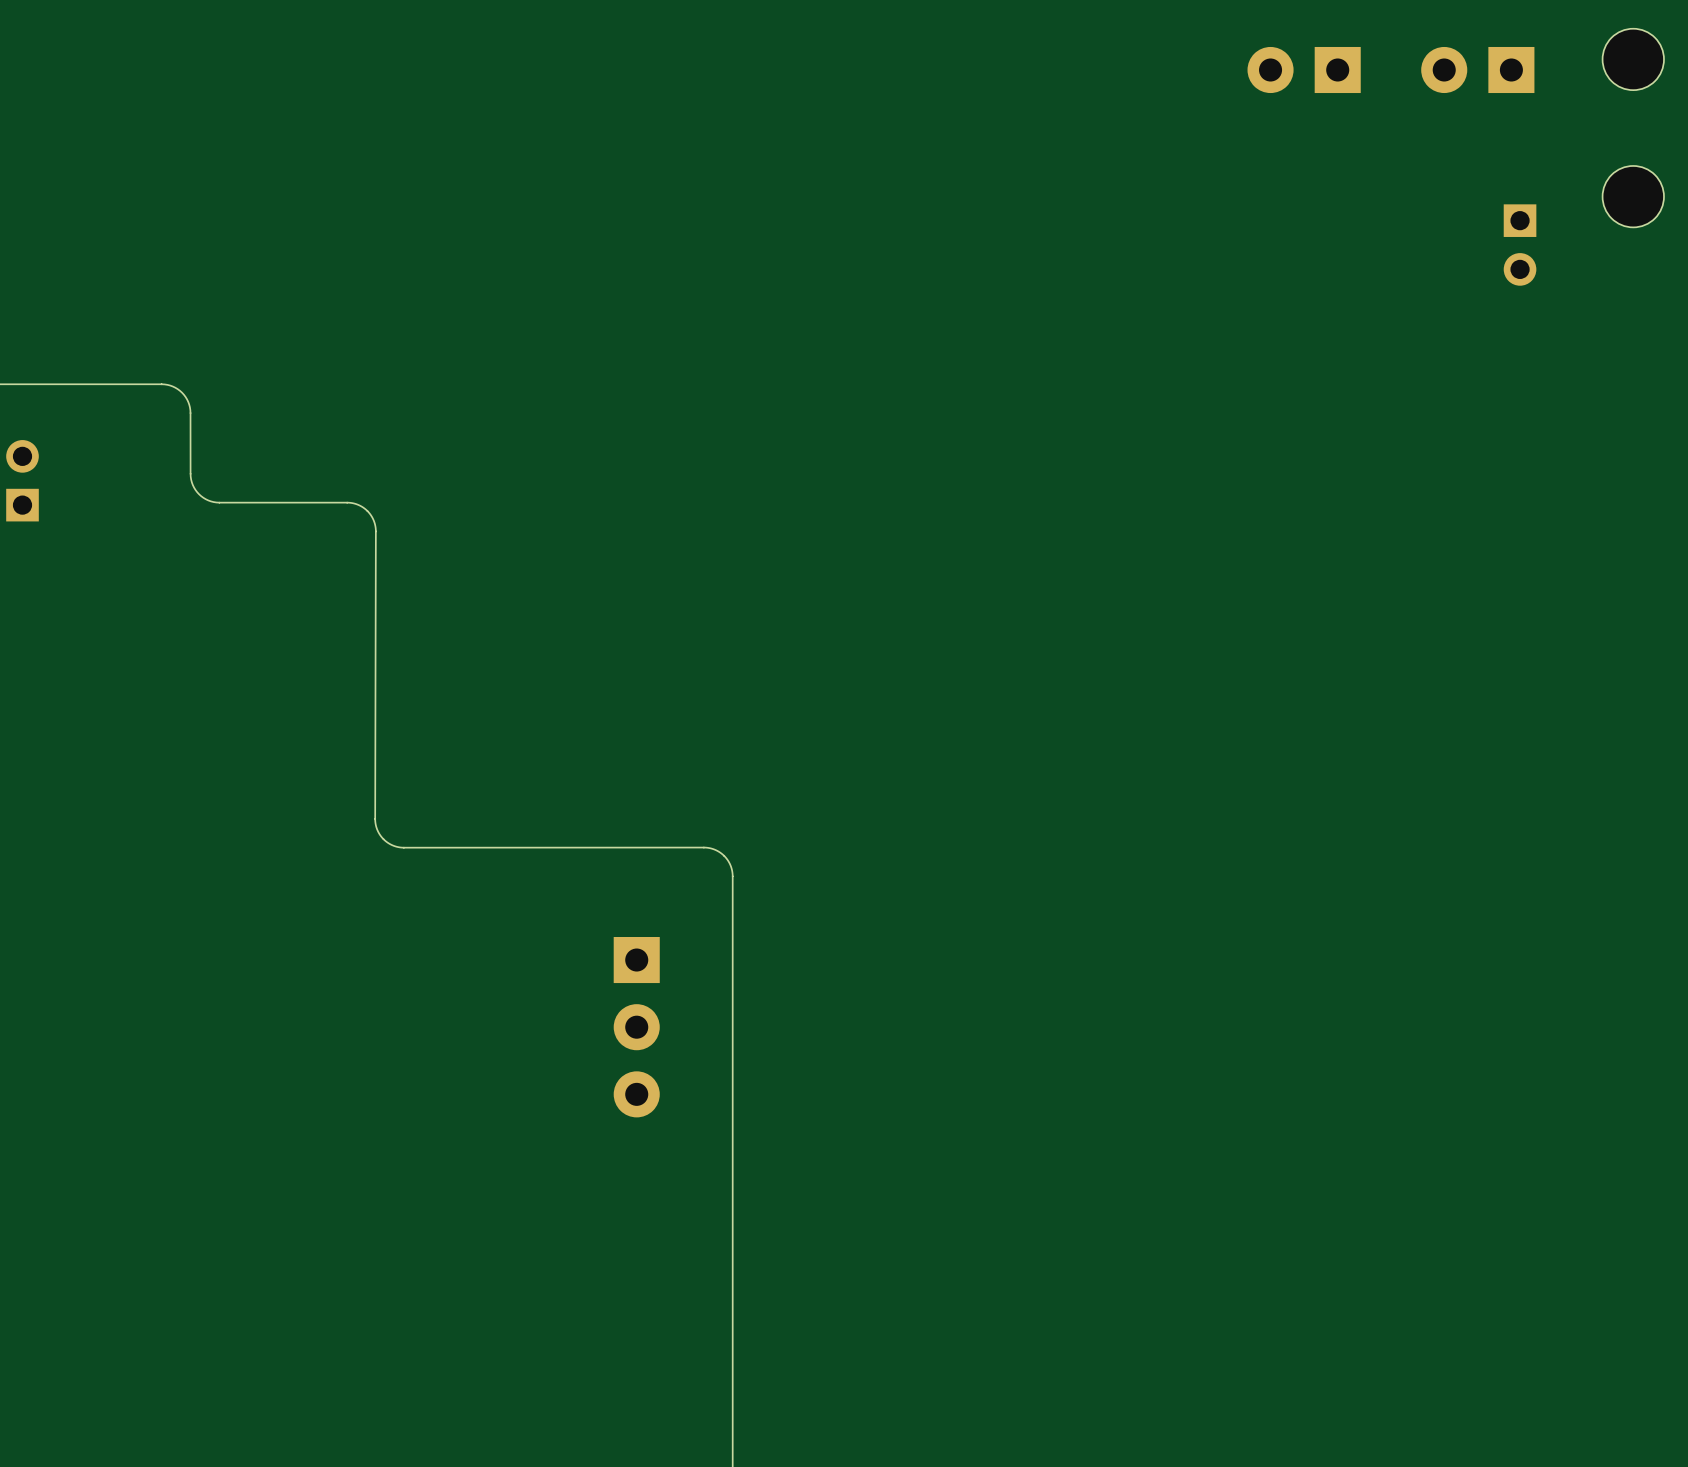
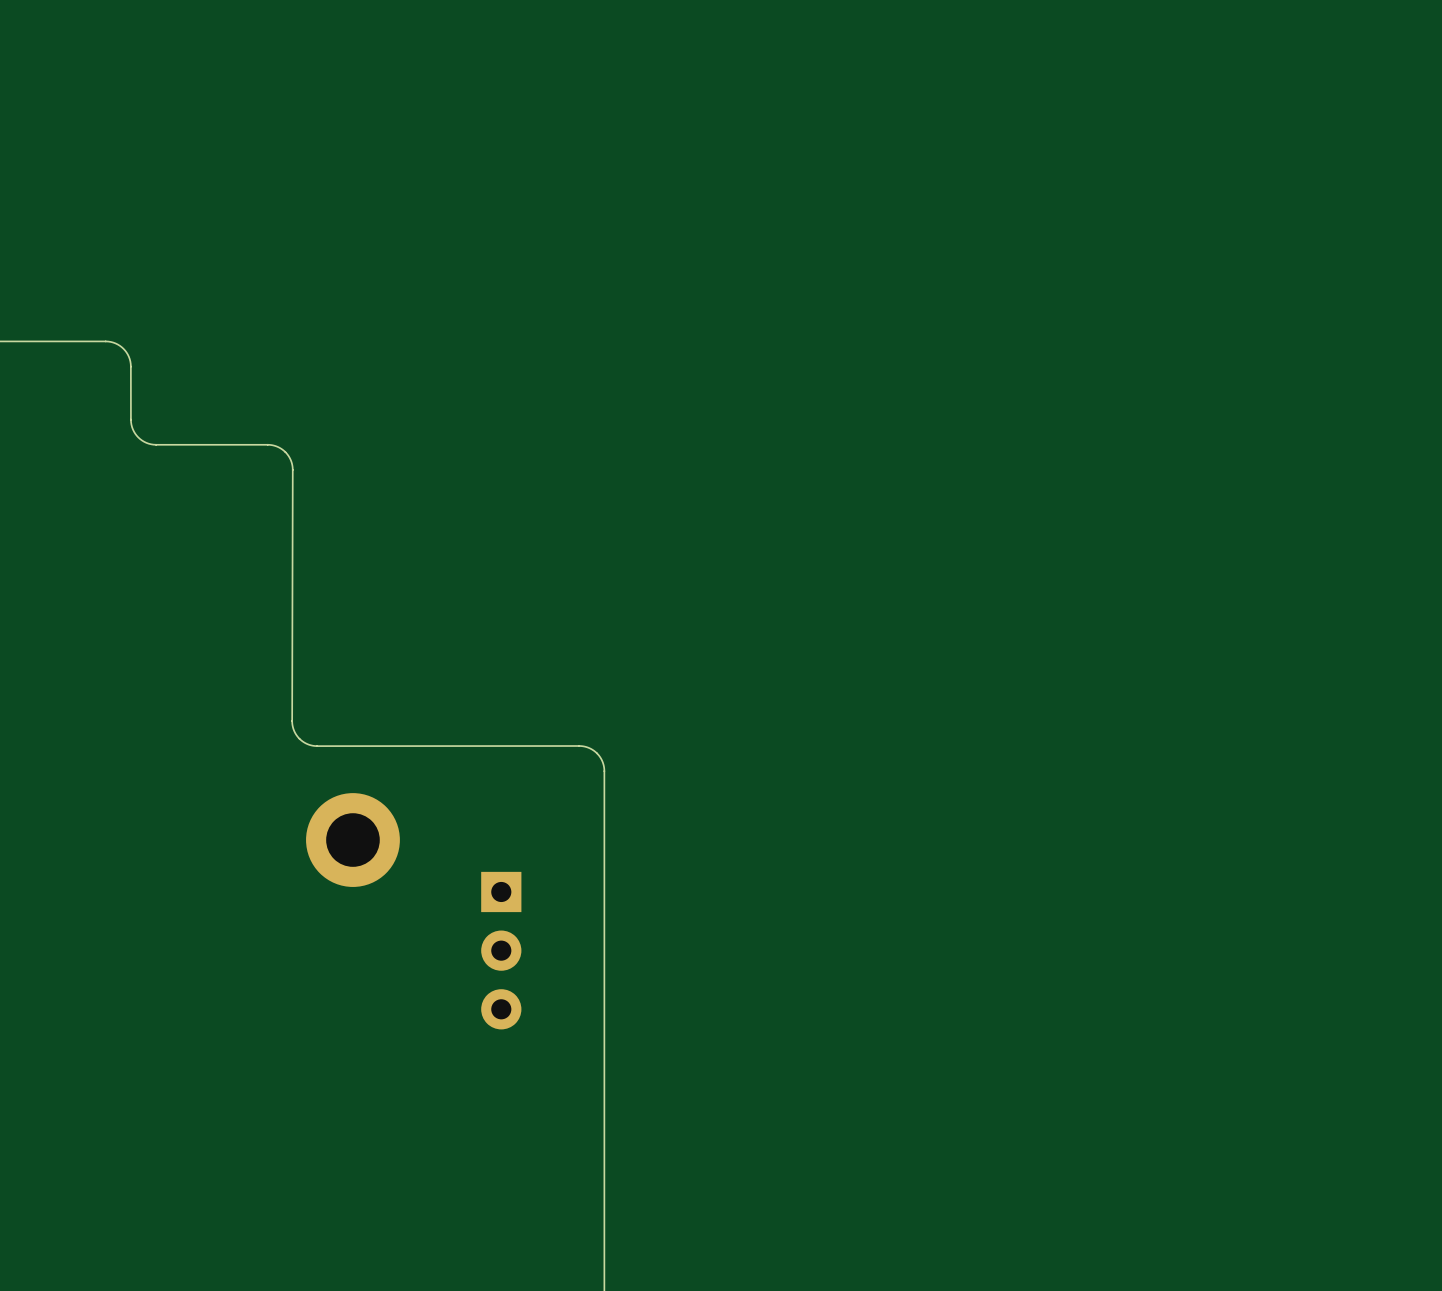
part: (1633, 59) -> none
part: (1304, 70) -> none
part: (1477, 70) -> none
part: (1633, 196) -> none
part: (1520, 245) -> none
part: none -> (352, 840)
part position: (636, 1027) -> (501, 950)

